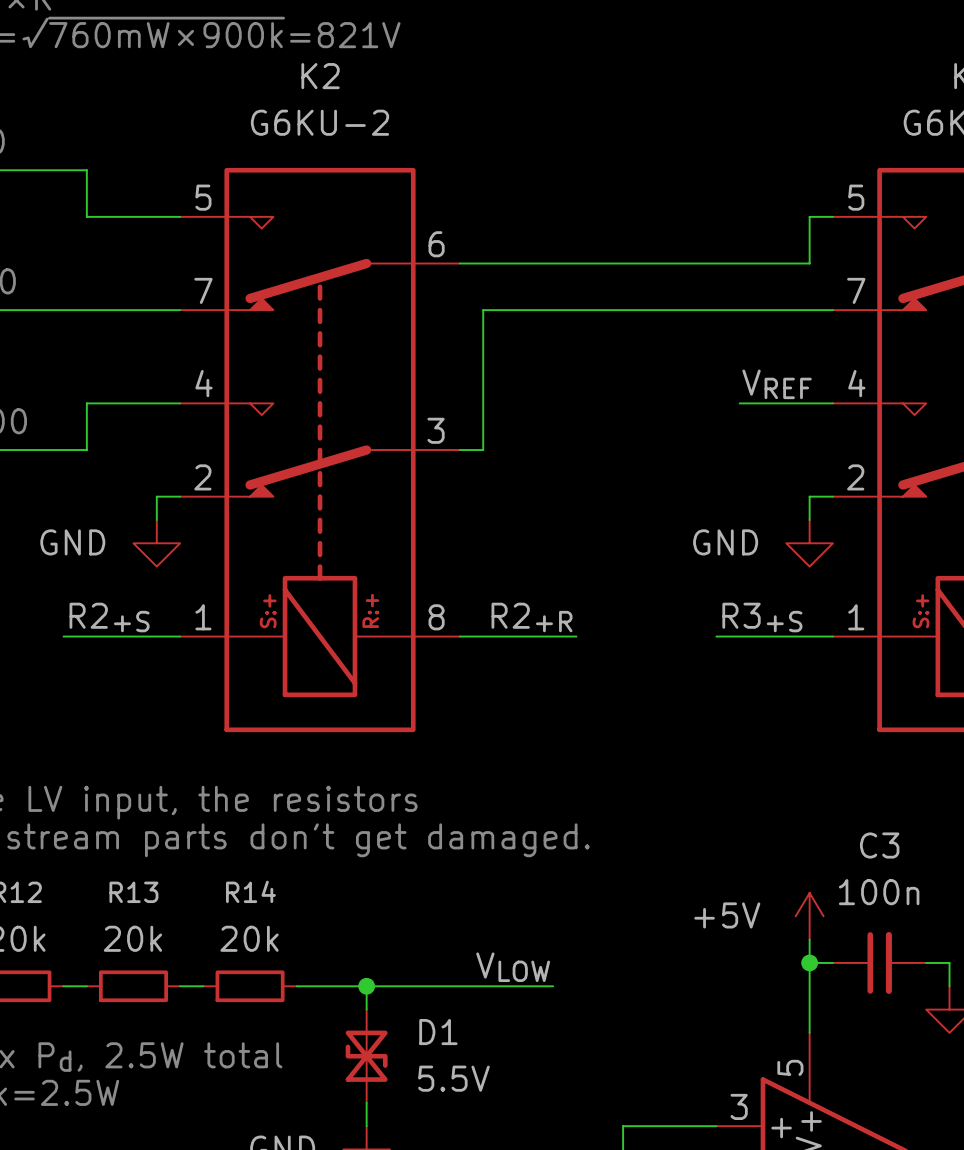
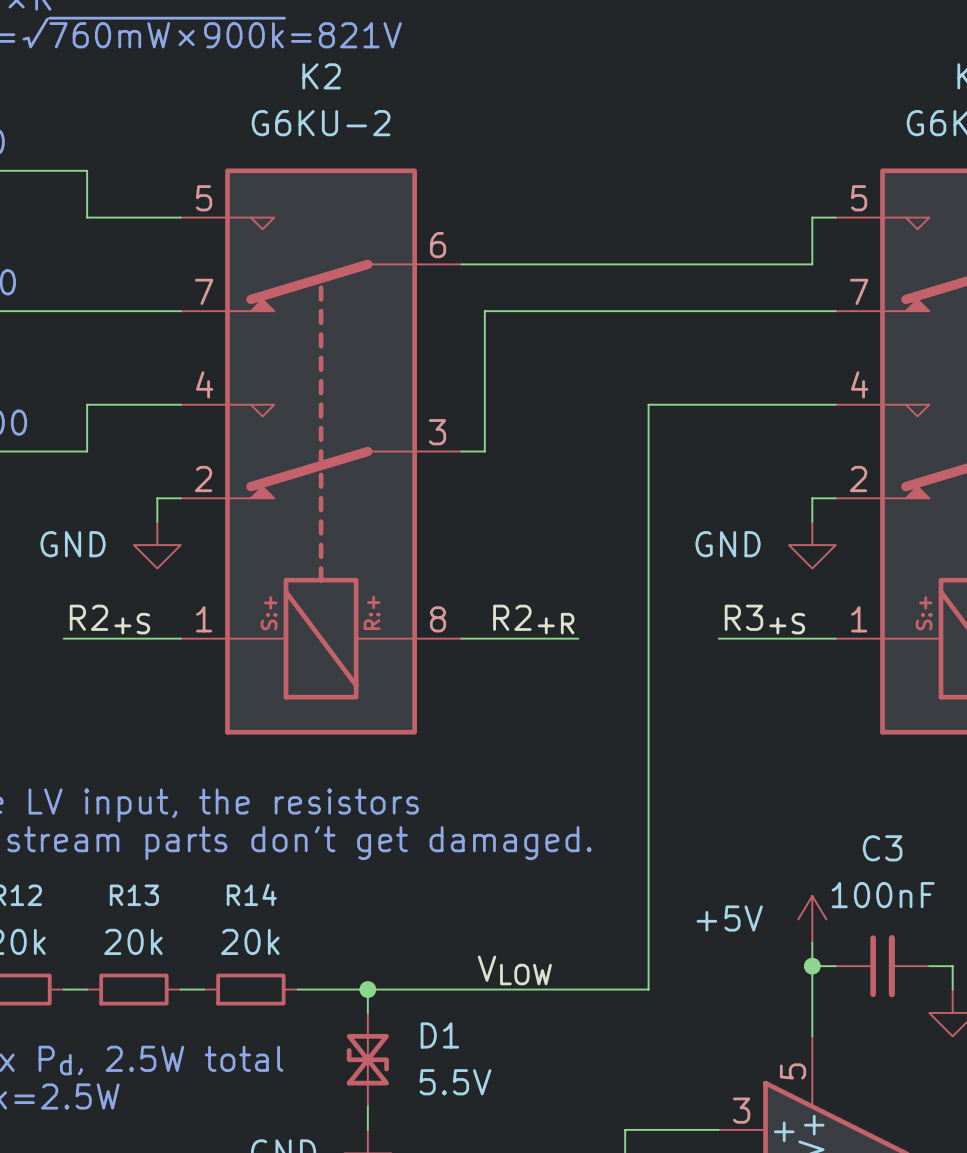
label: VREF (777, 384) -> none
wire: none -> (742, 404) (648, 404) (648, 989) (555, 989)
C3 value: 100n (879, 892) -> 100nF (883, 895)

